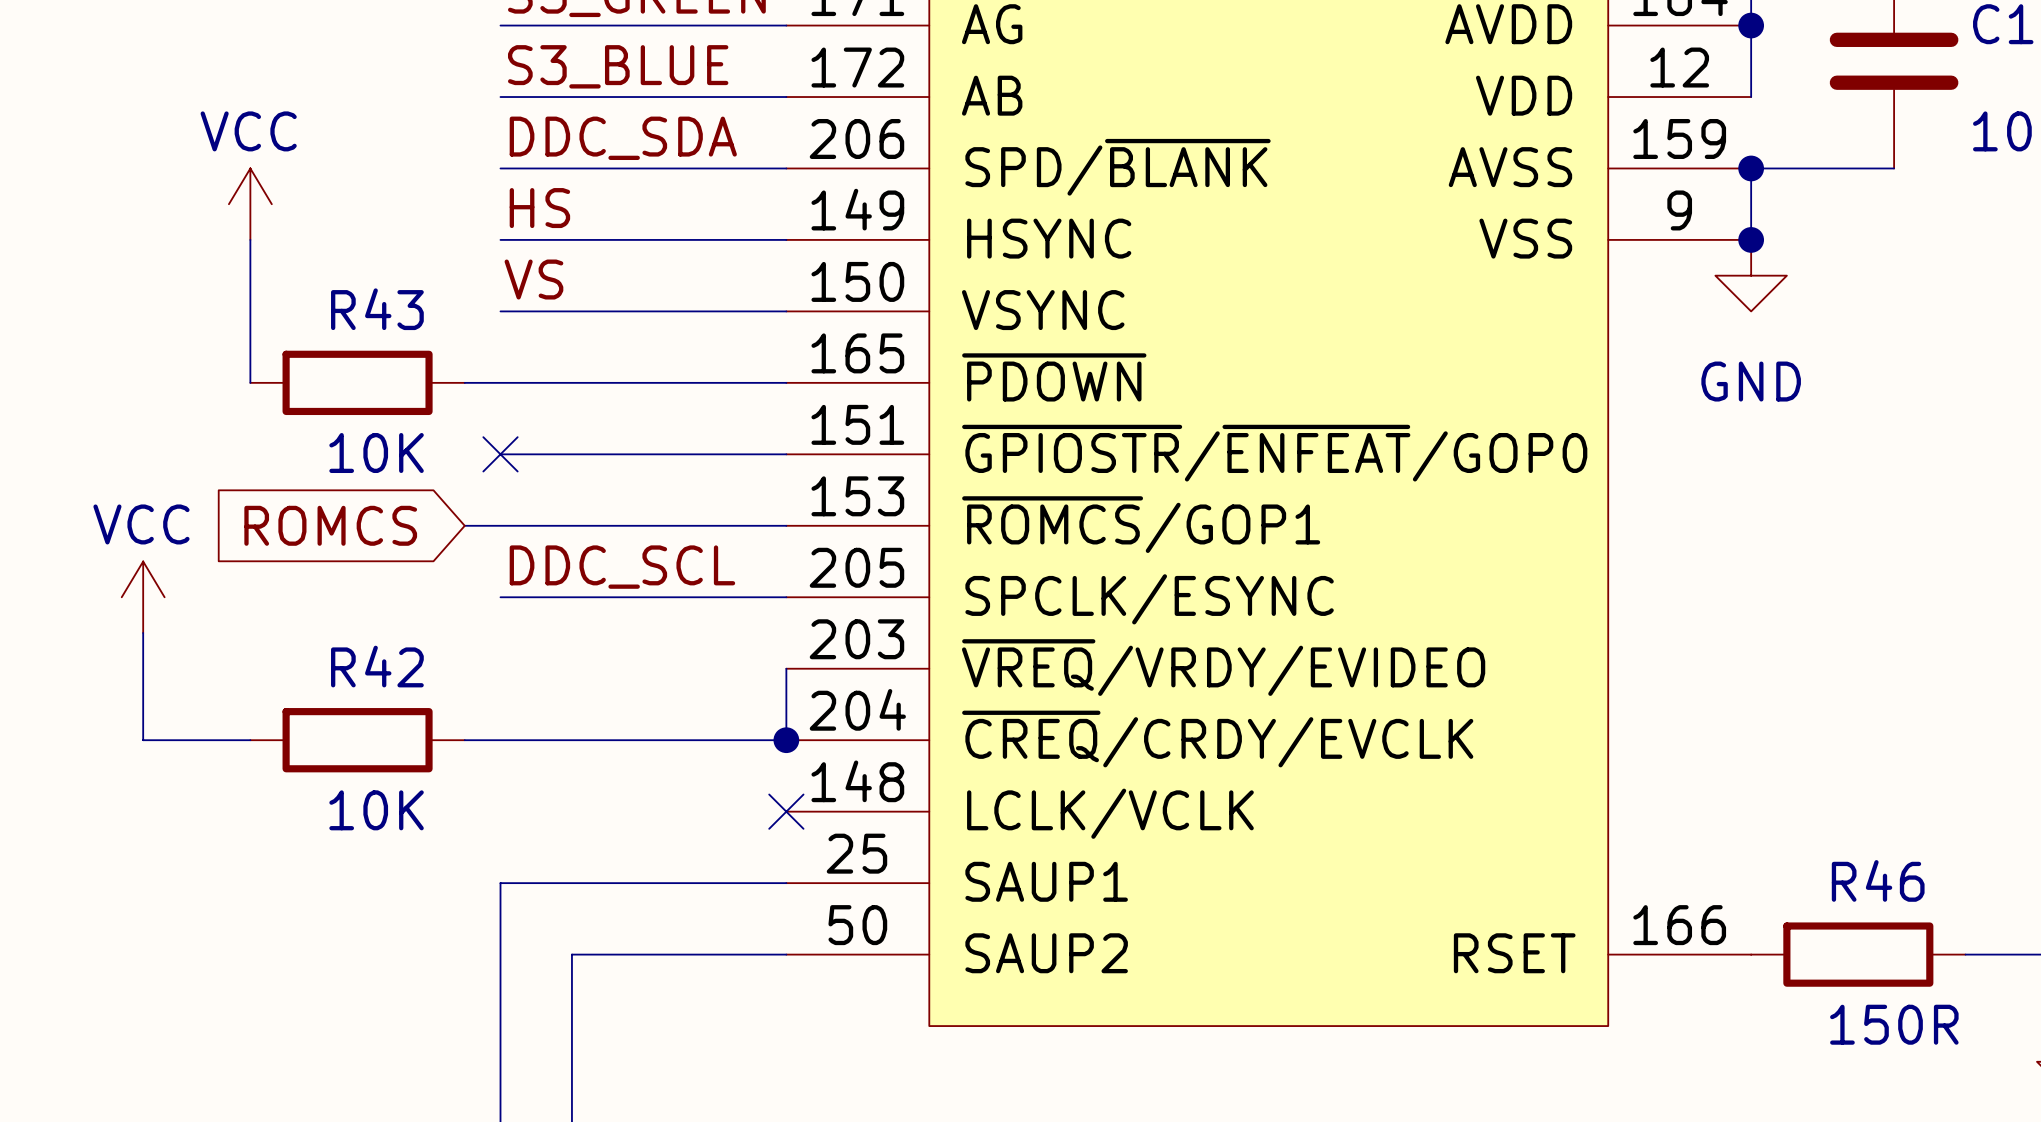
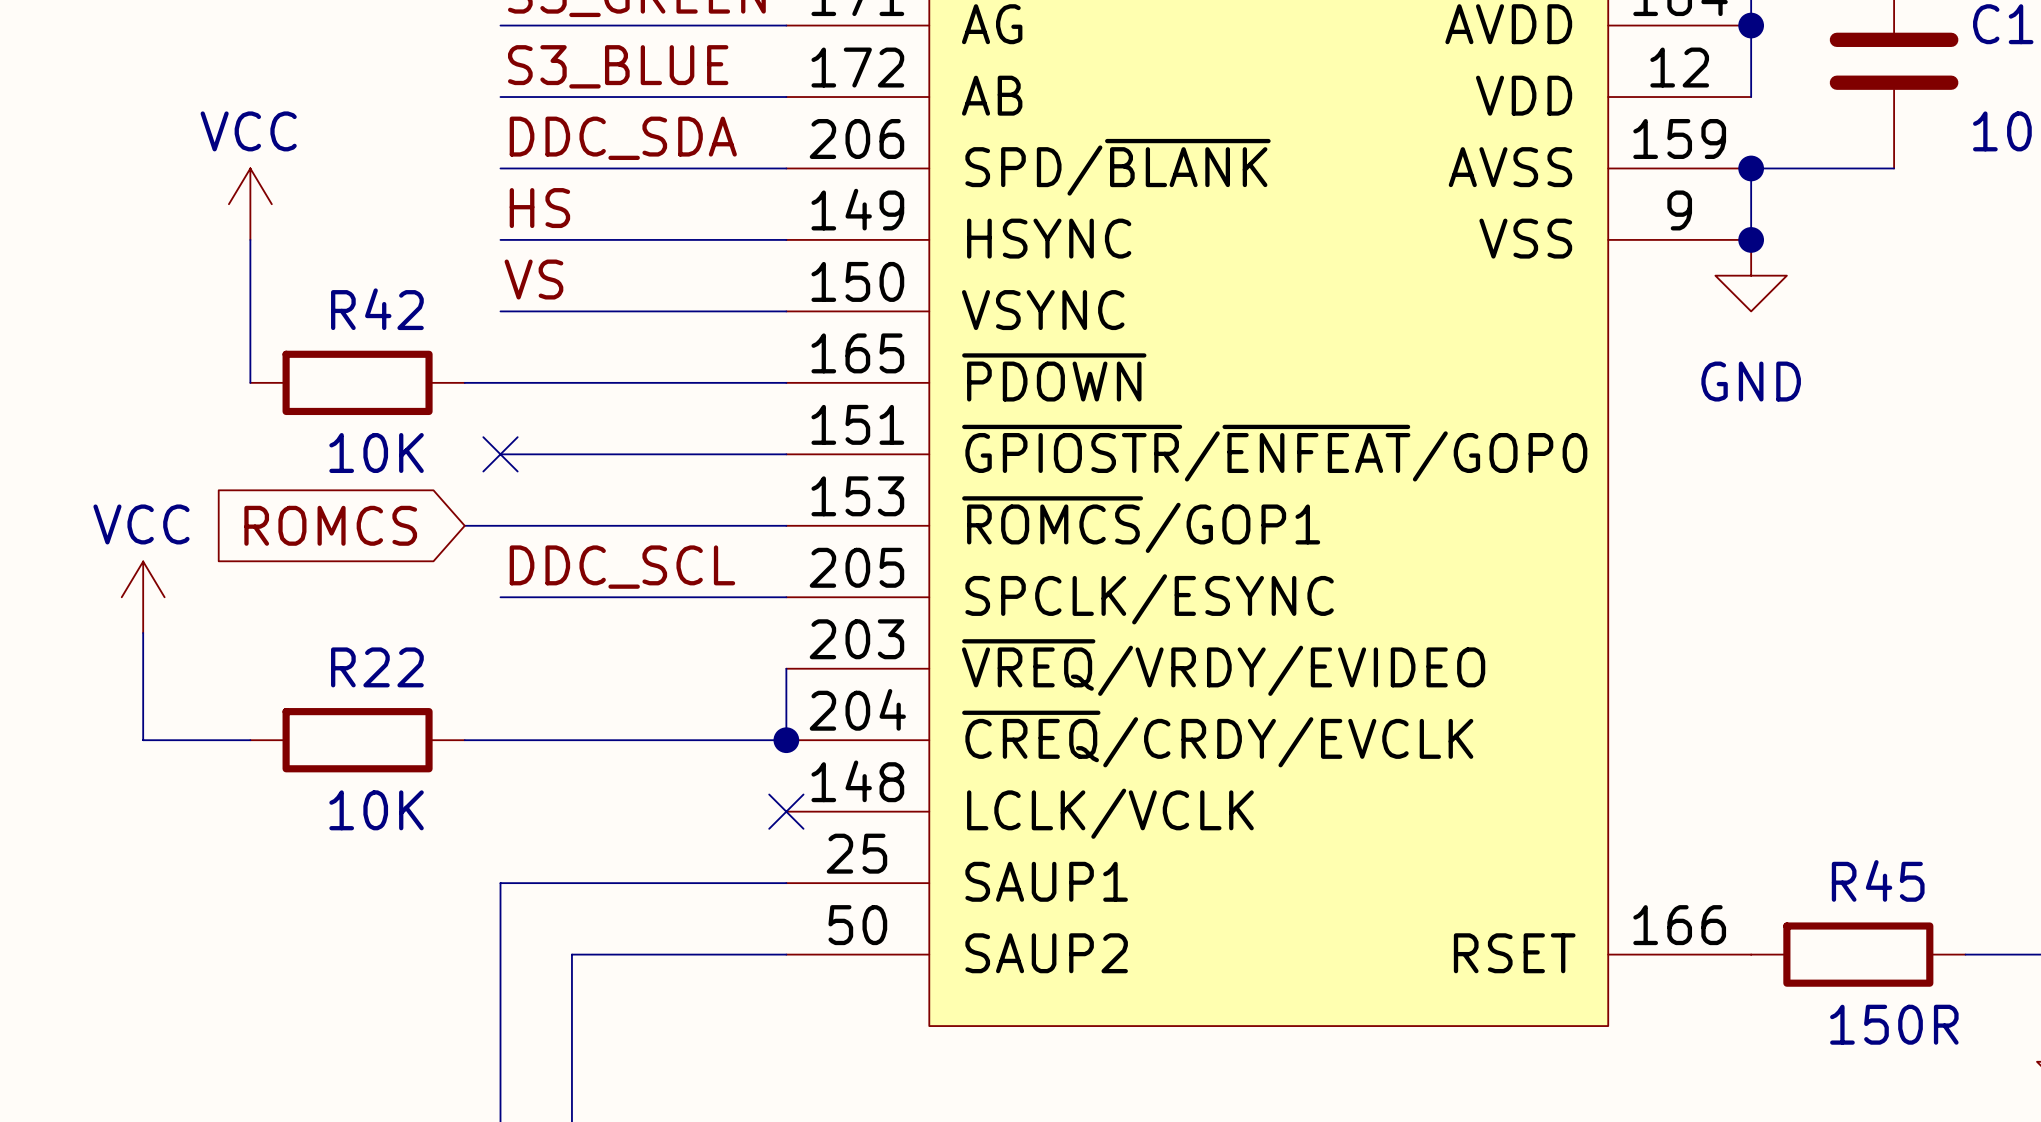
R43 name: R43 (377, 309) -> R42 (377, 309)
R42 name: R42 (377, 666) -> R22 (377, 667)
R46 name: R46 (1878, 880) -> R45 (1878, 880)

